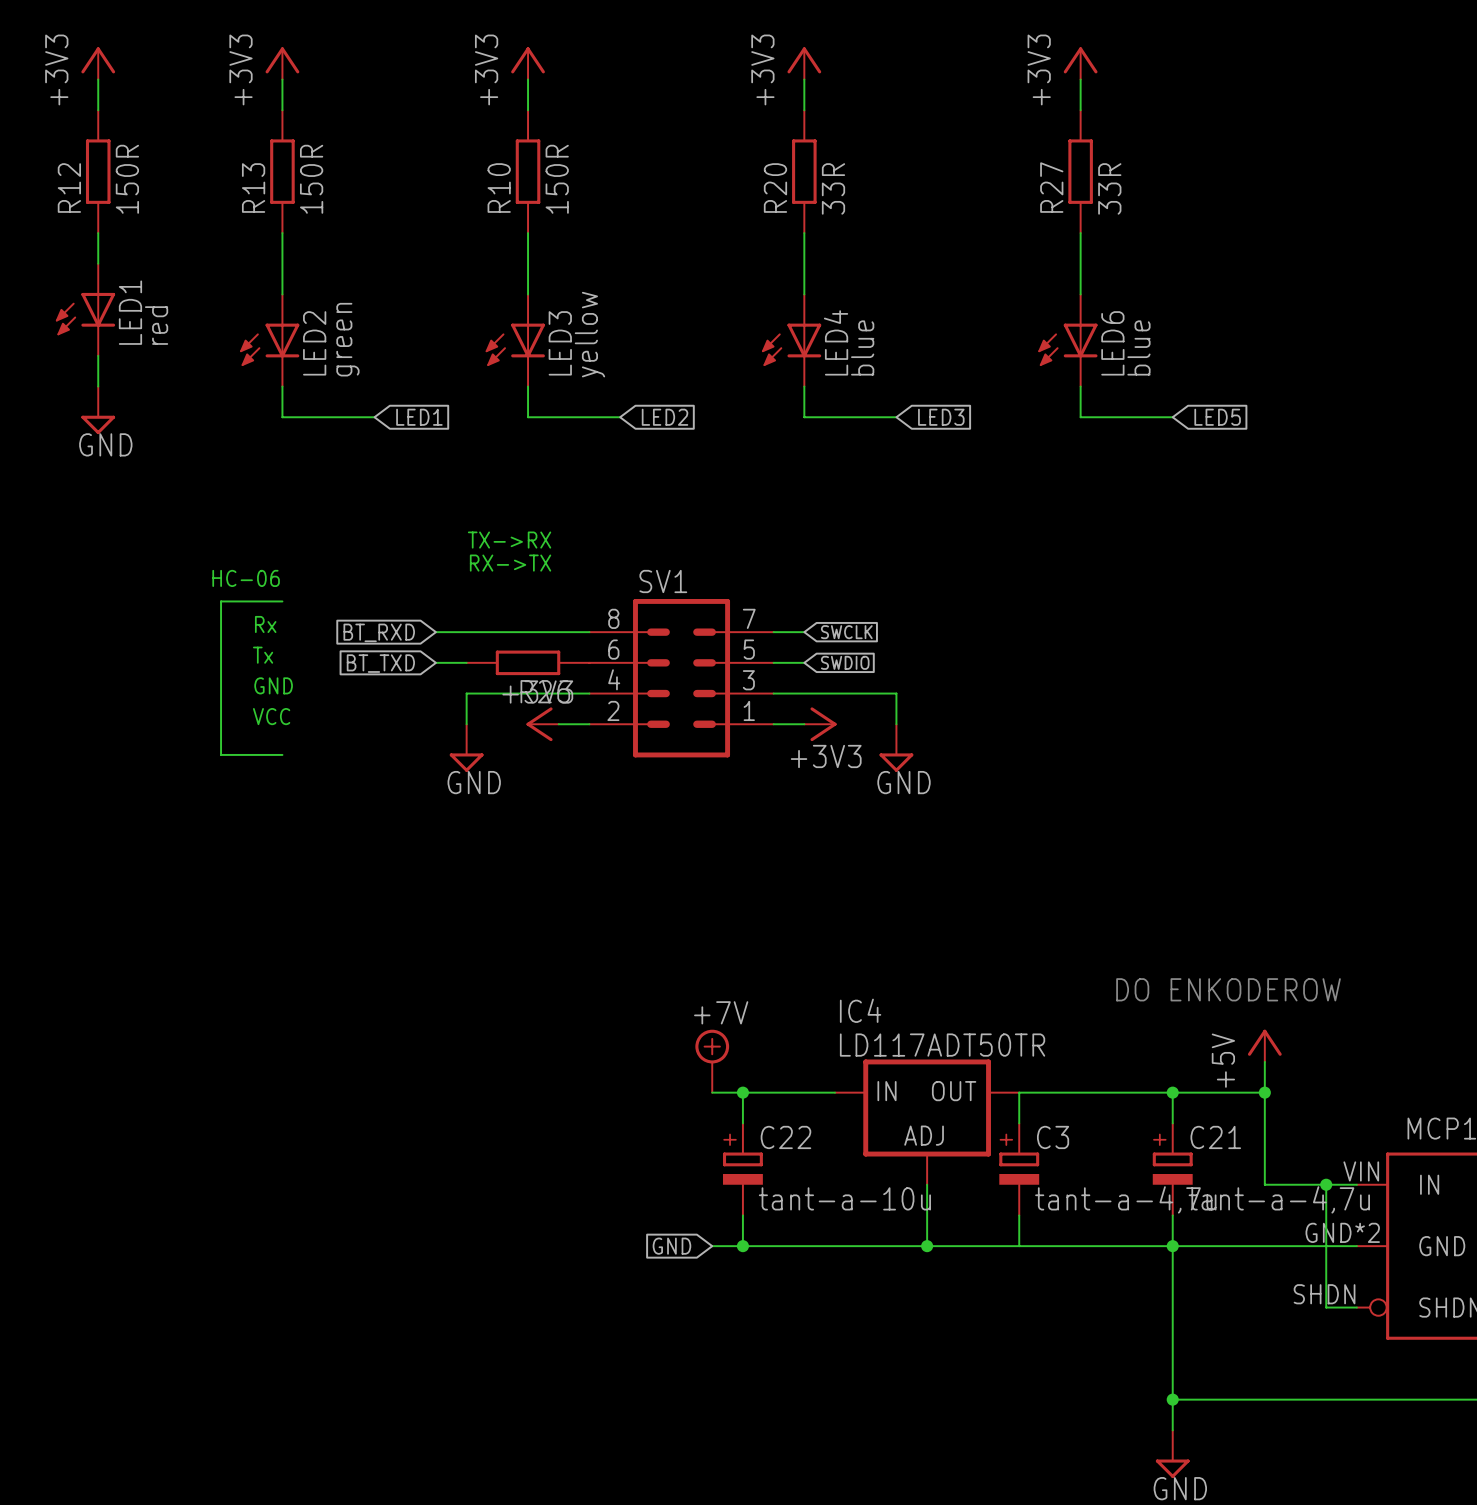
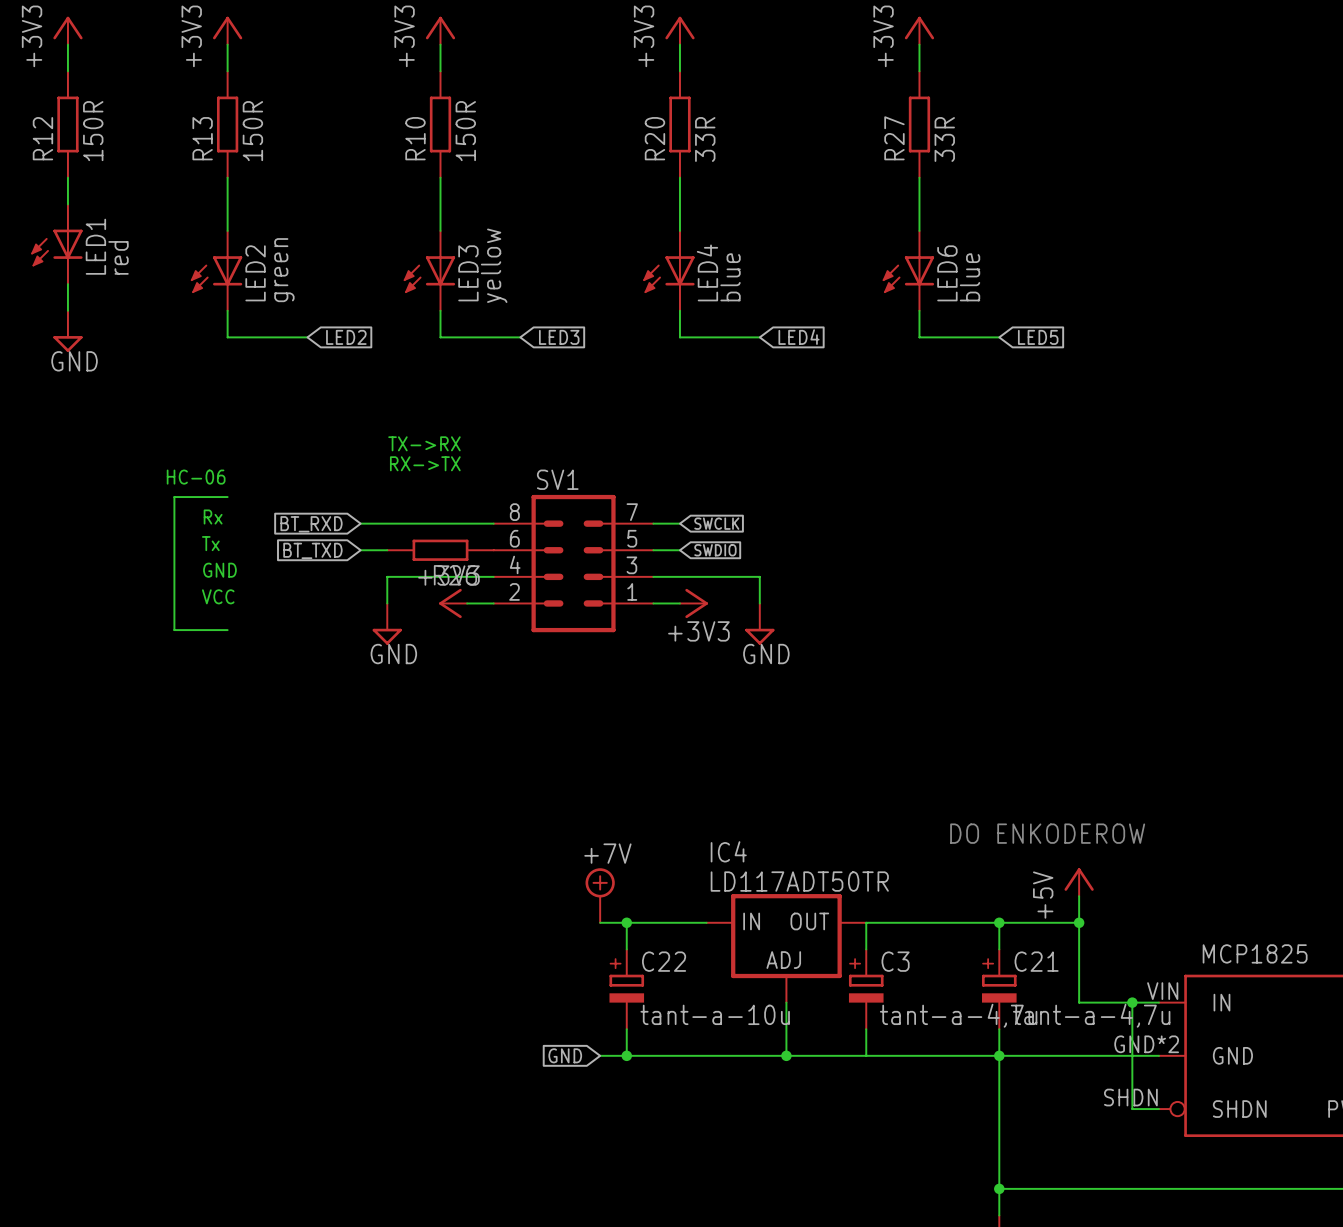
global label: LED1 (419, 417) -> LED2 (346, 337)
global label: LED2 (665, 417) -> LED3 (559, 337)
global label: LED3 (941, 417) -> LED4 (799, 337)

